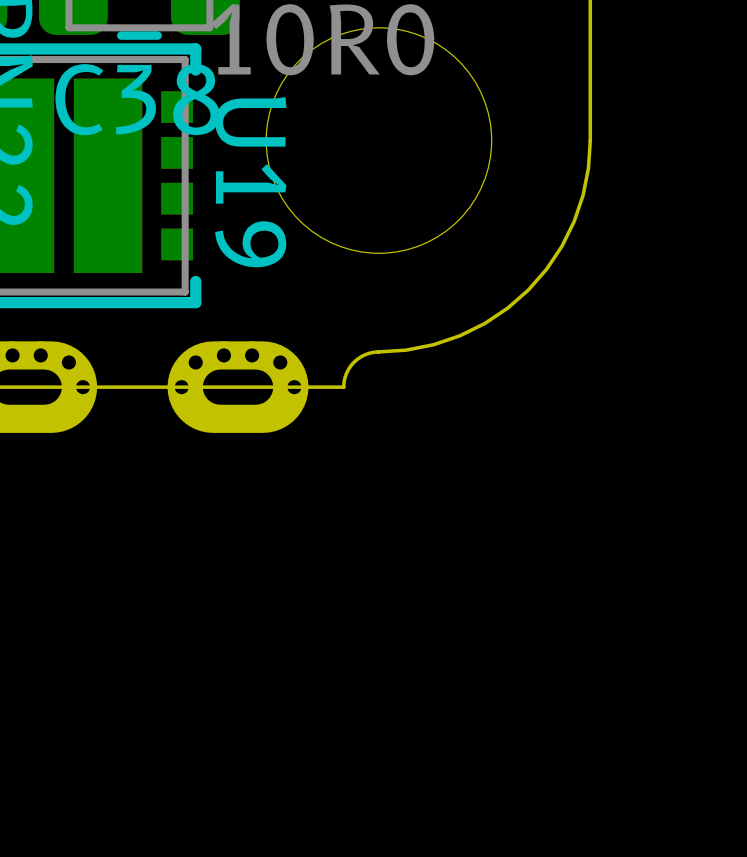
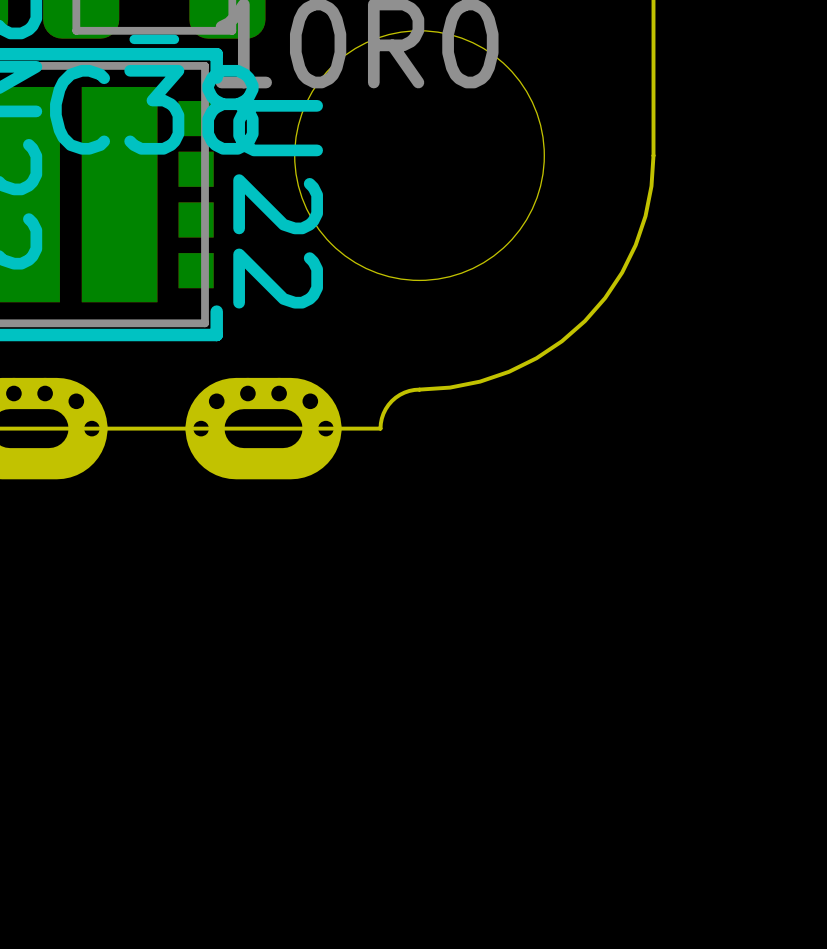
U19 name: U19 (250, 182) -> U22 (278, 204)

